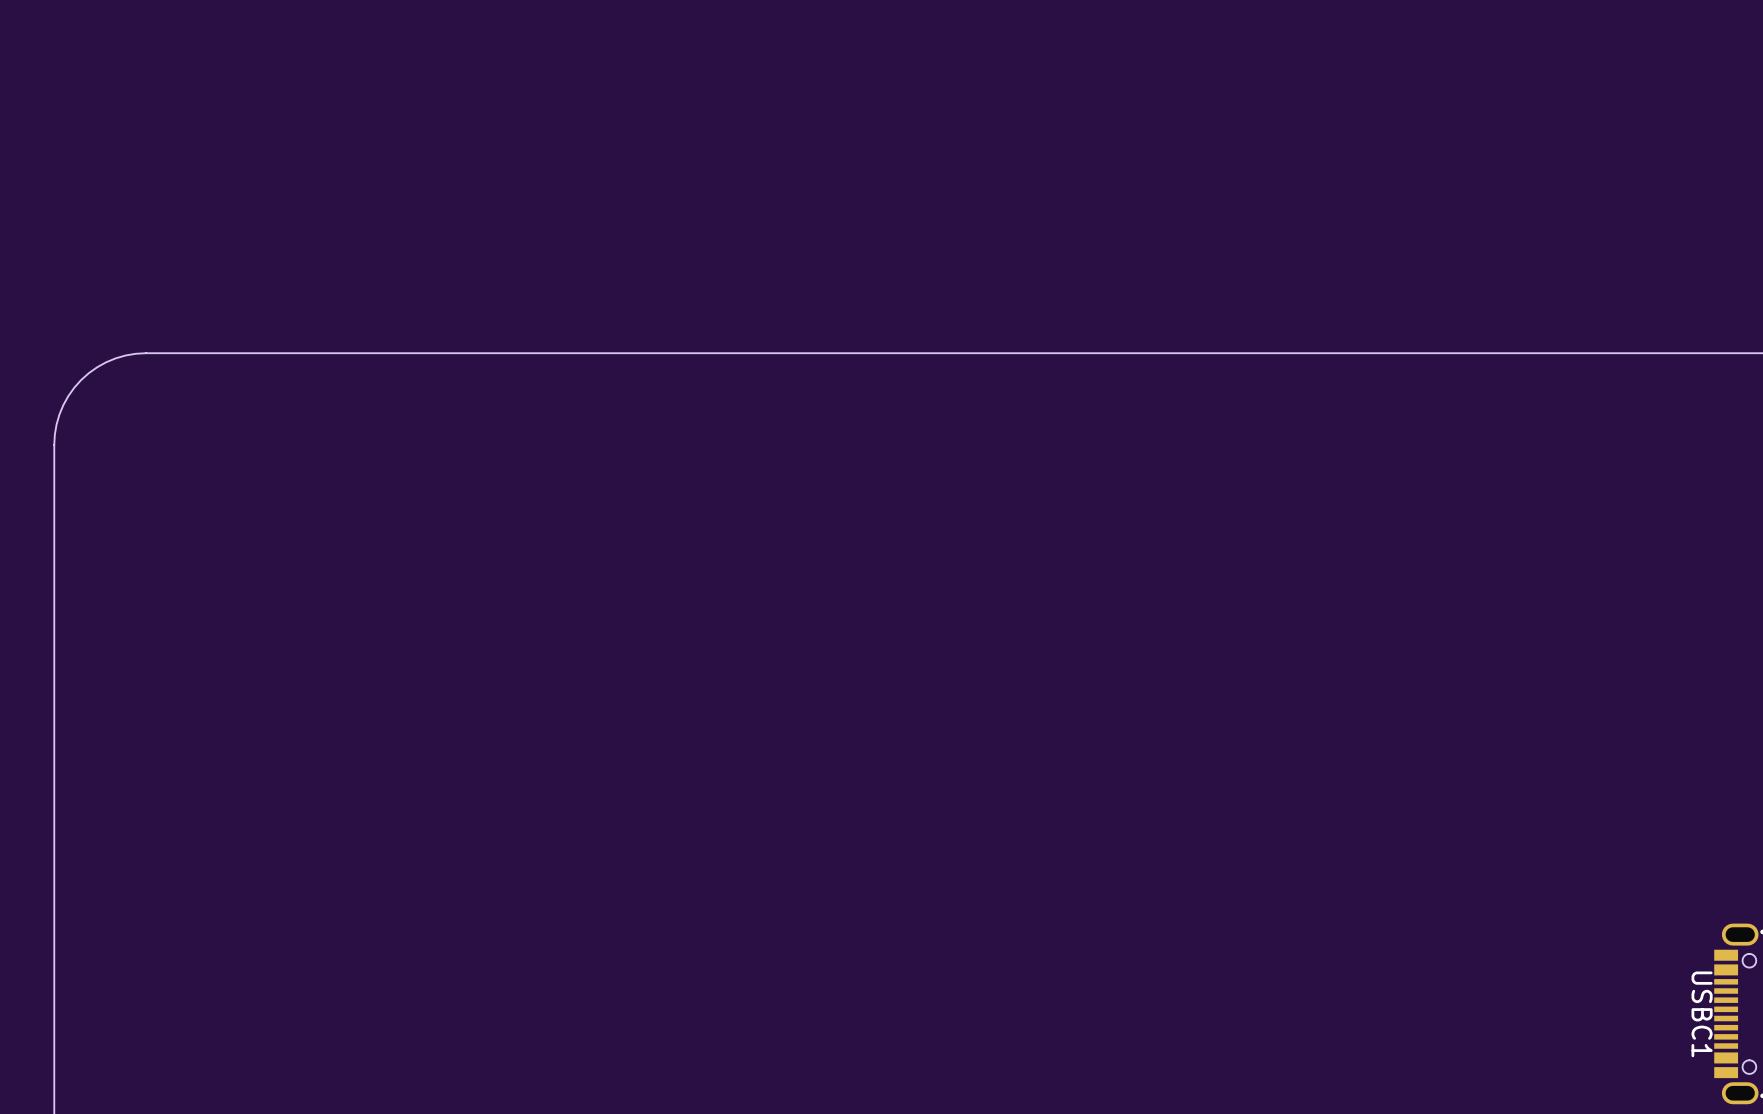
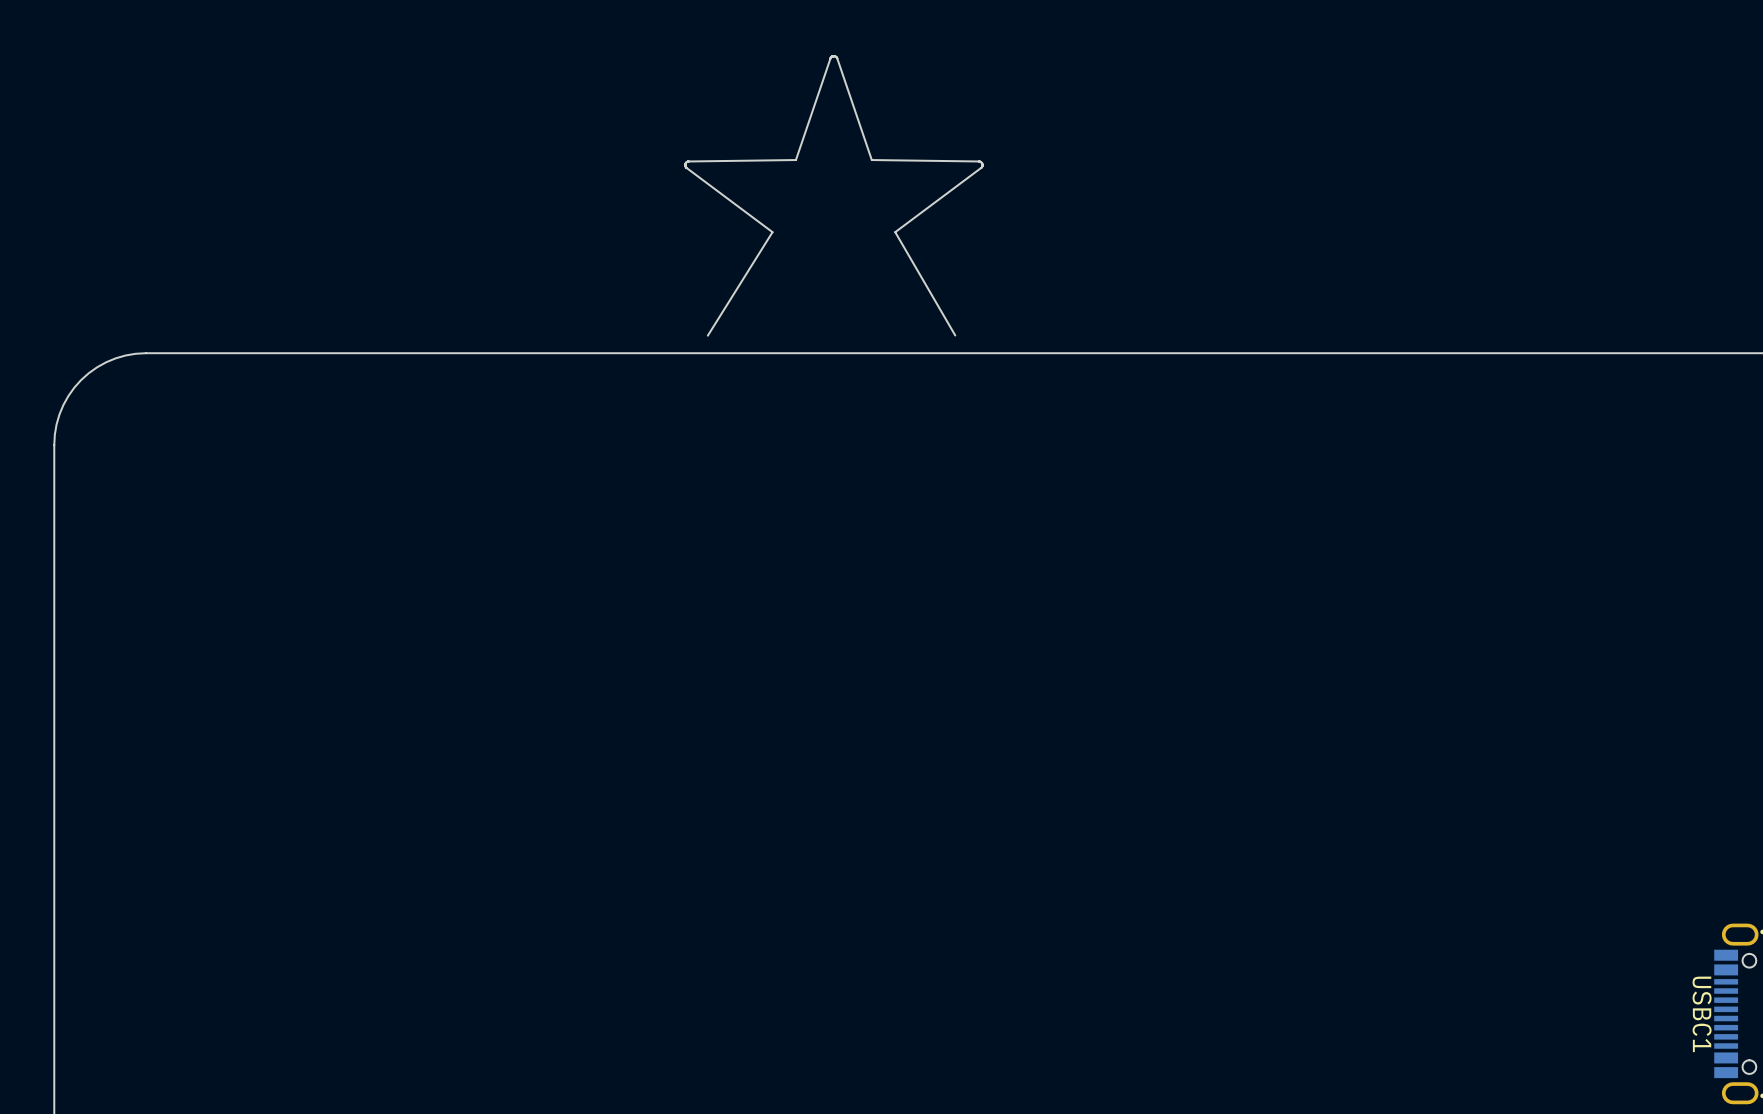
board edge: none -> (830, 58) (795, 160) (688, 161)
board edge: none -> (837, 58) (871, 160) (978, 161)
board edge: none -> (686, 168) (772, 232) (707, 335)
board edge: none -> (981, 168) (895, 232) (955, 335)

